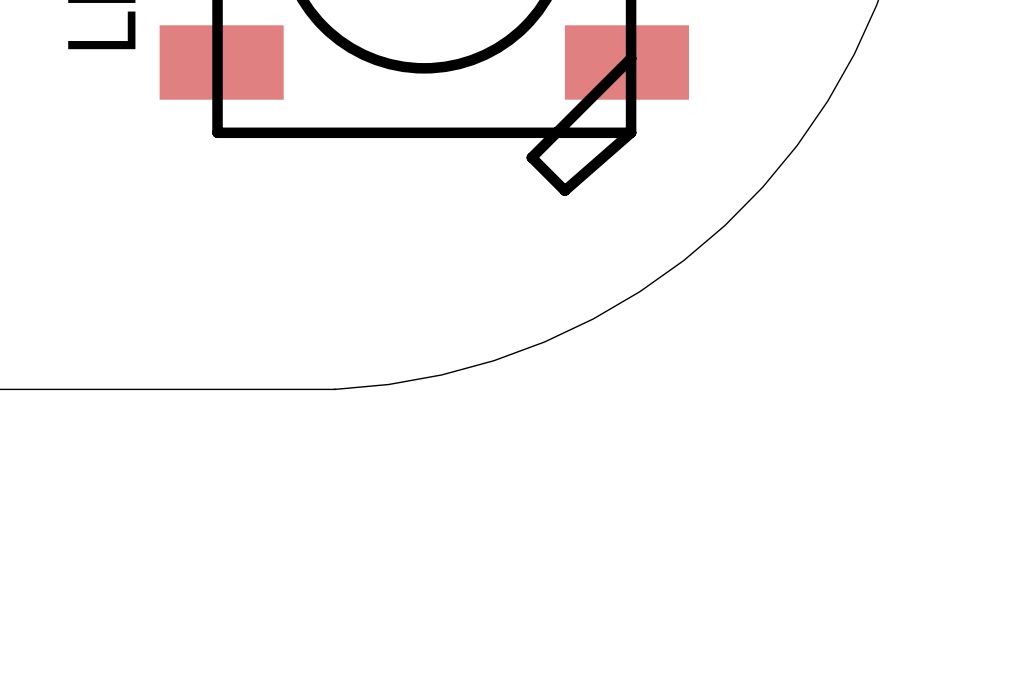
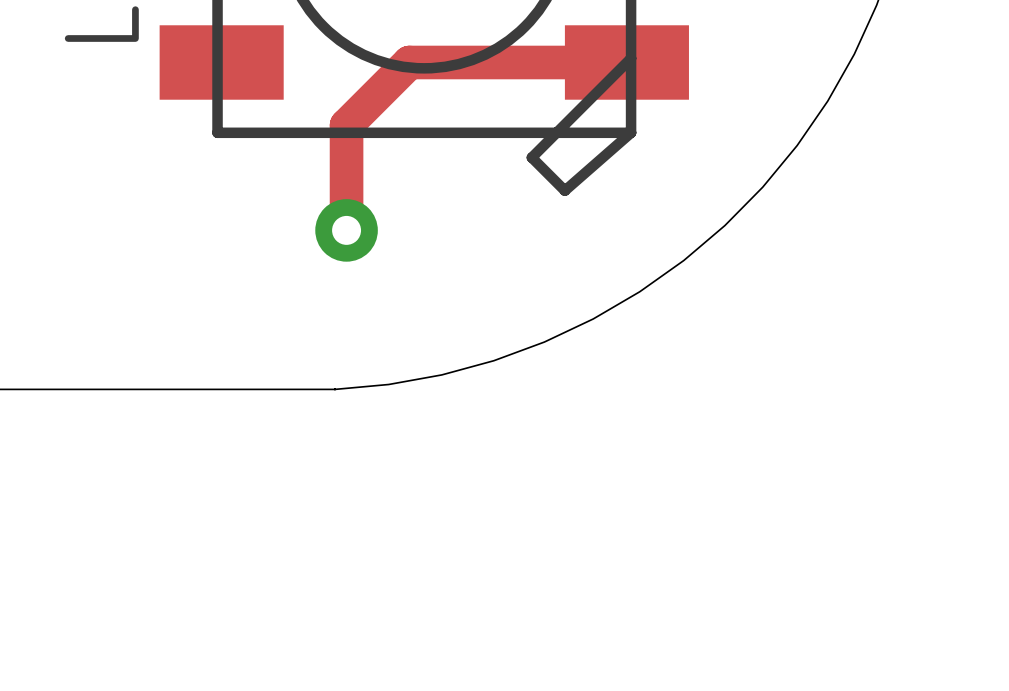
top track: none -> (626, 62) (409, 62) (346, 125) (346, 230)
via: none -> (346, 230)

